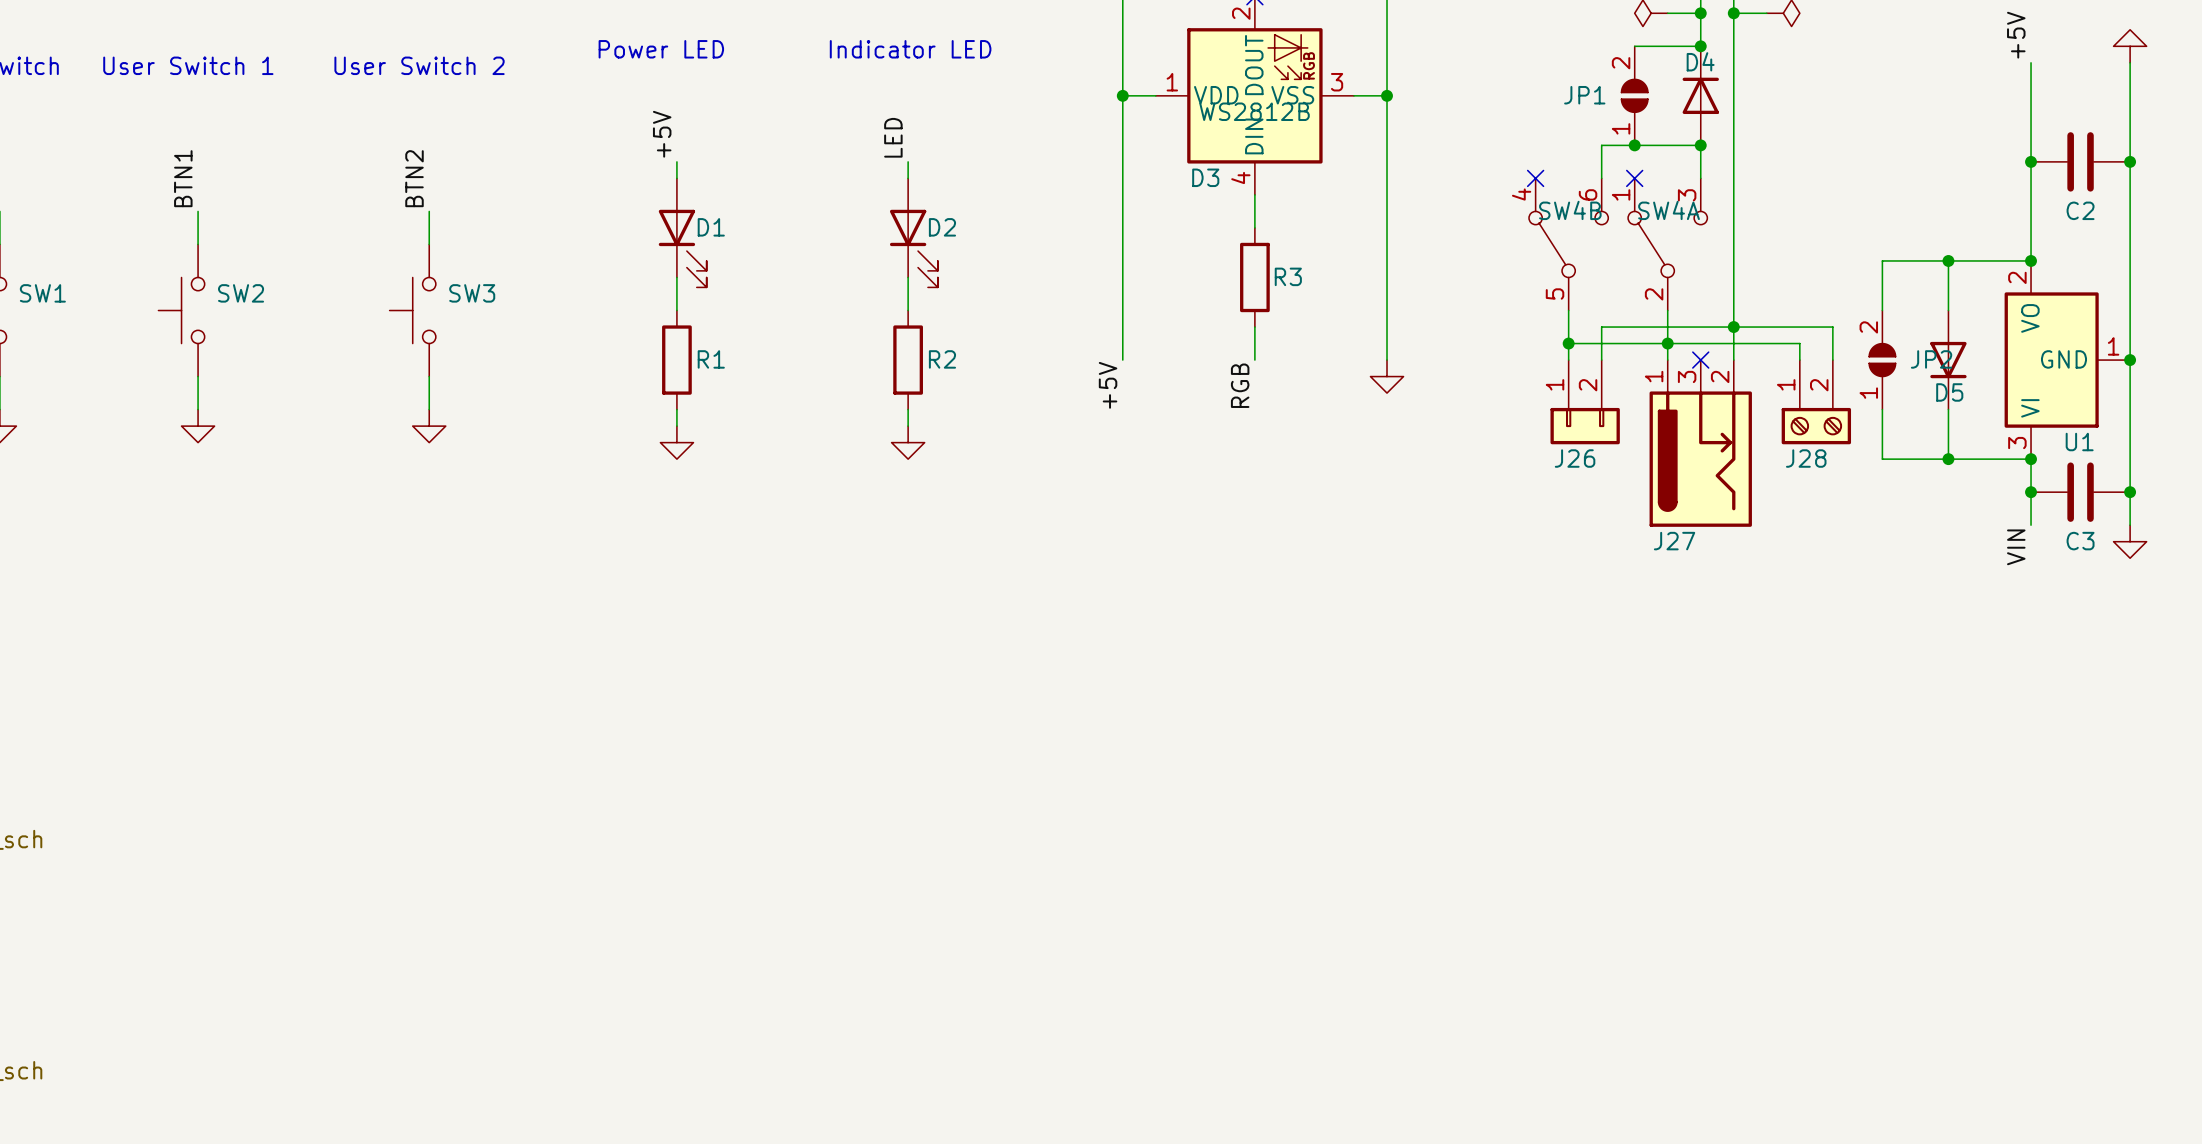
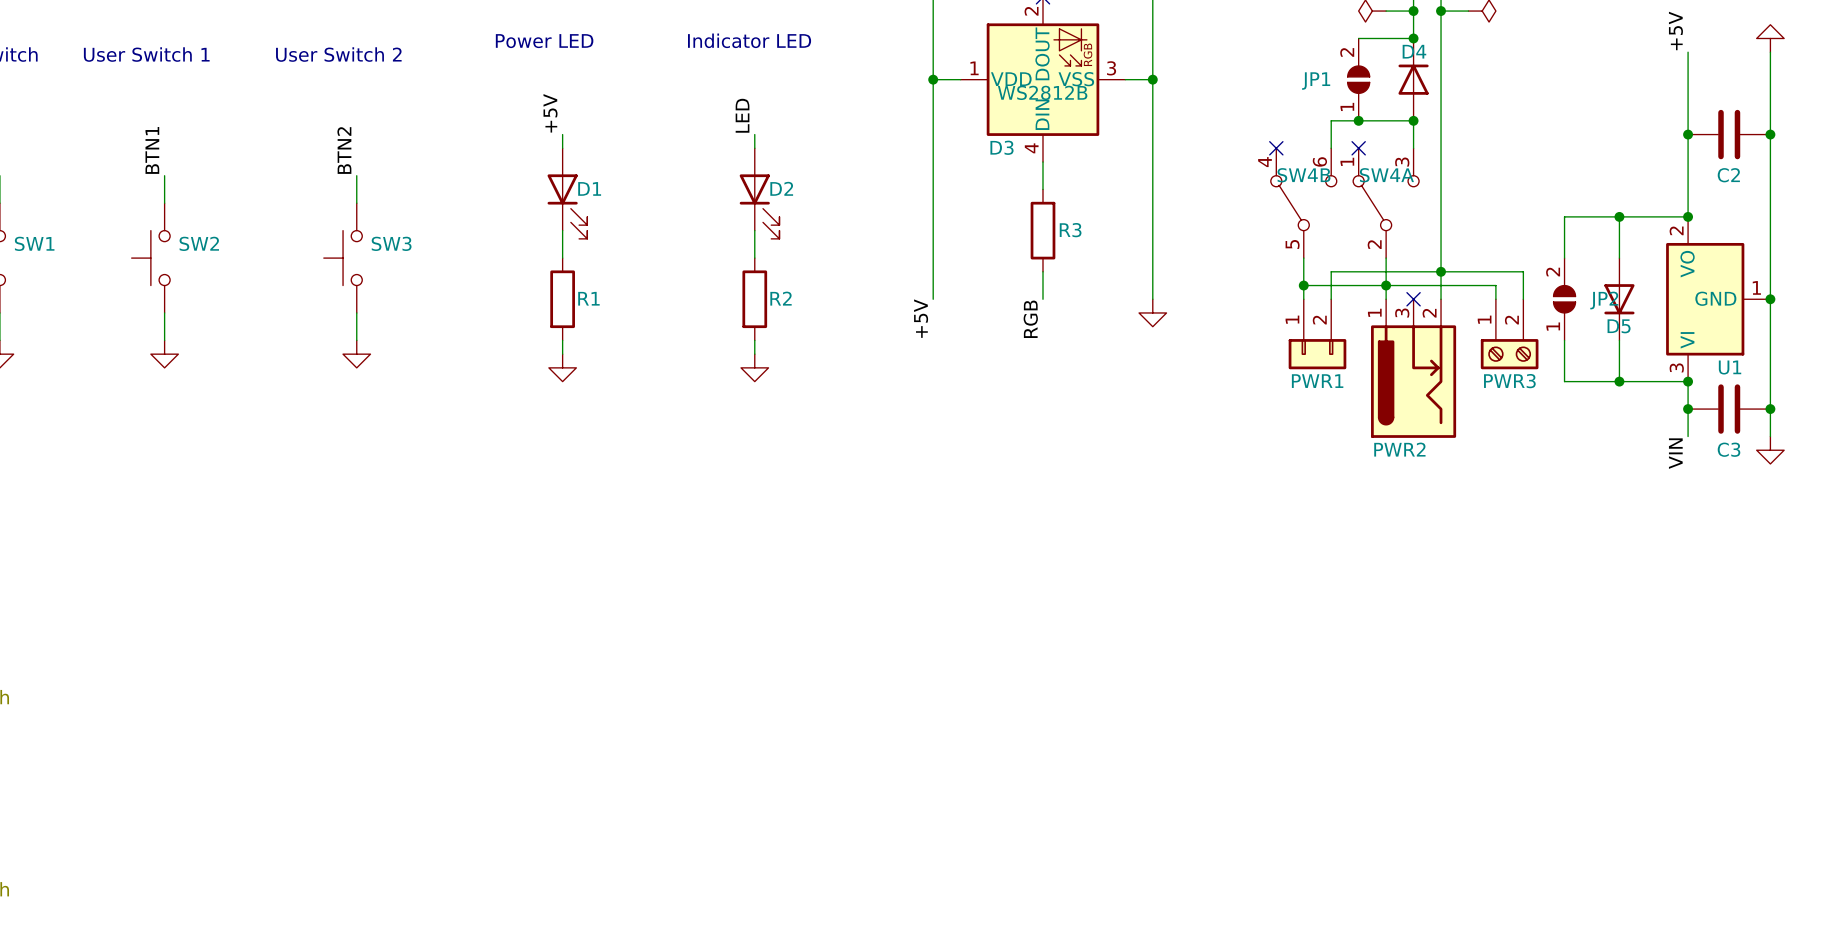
J26 name: J26 (1575, 458) -> PWR1 (1317, 381)
J28 name: J28 (1806, 458) -> PWR3 (1509, 381)
J27 name: J27 (1674, 541) -> PWR2 (1399, 449)

